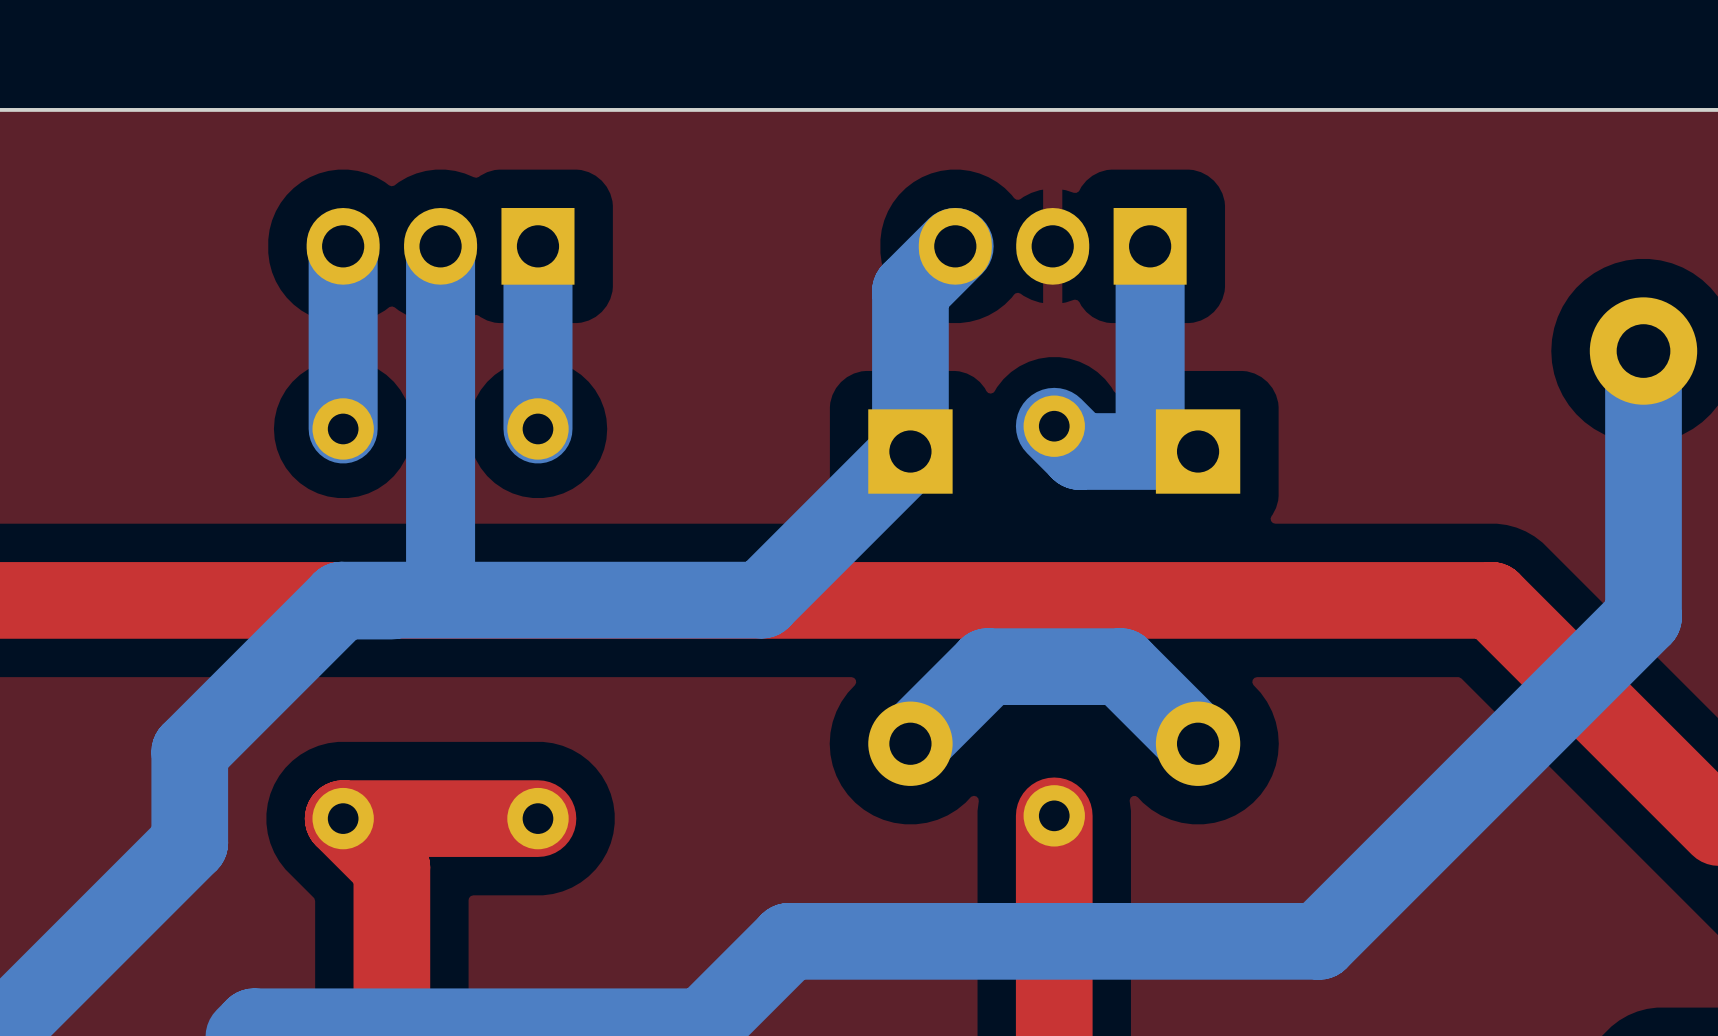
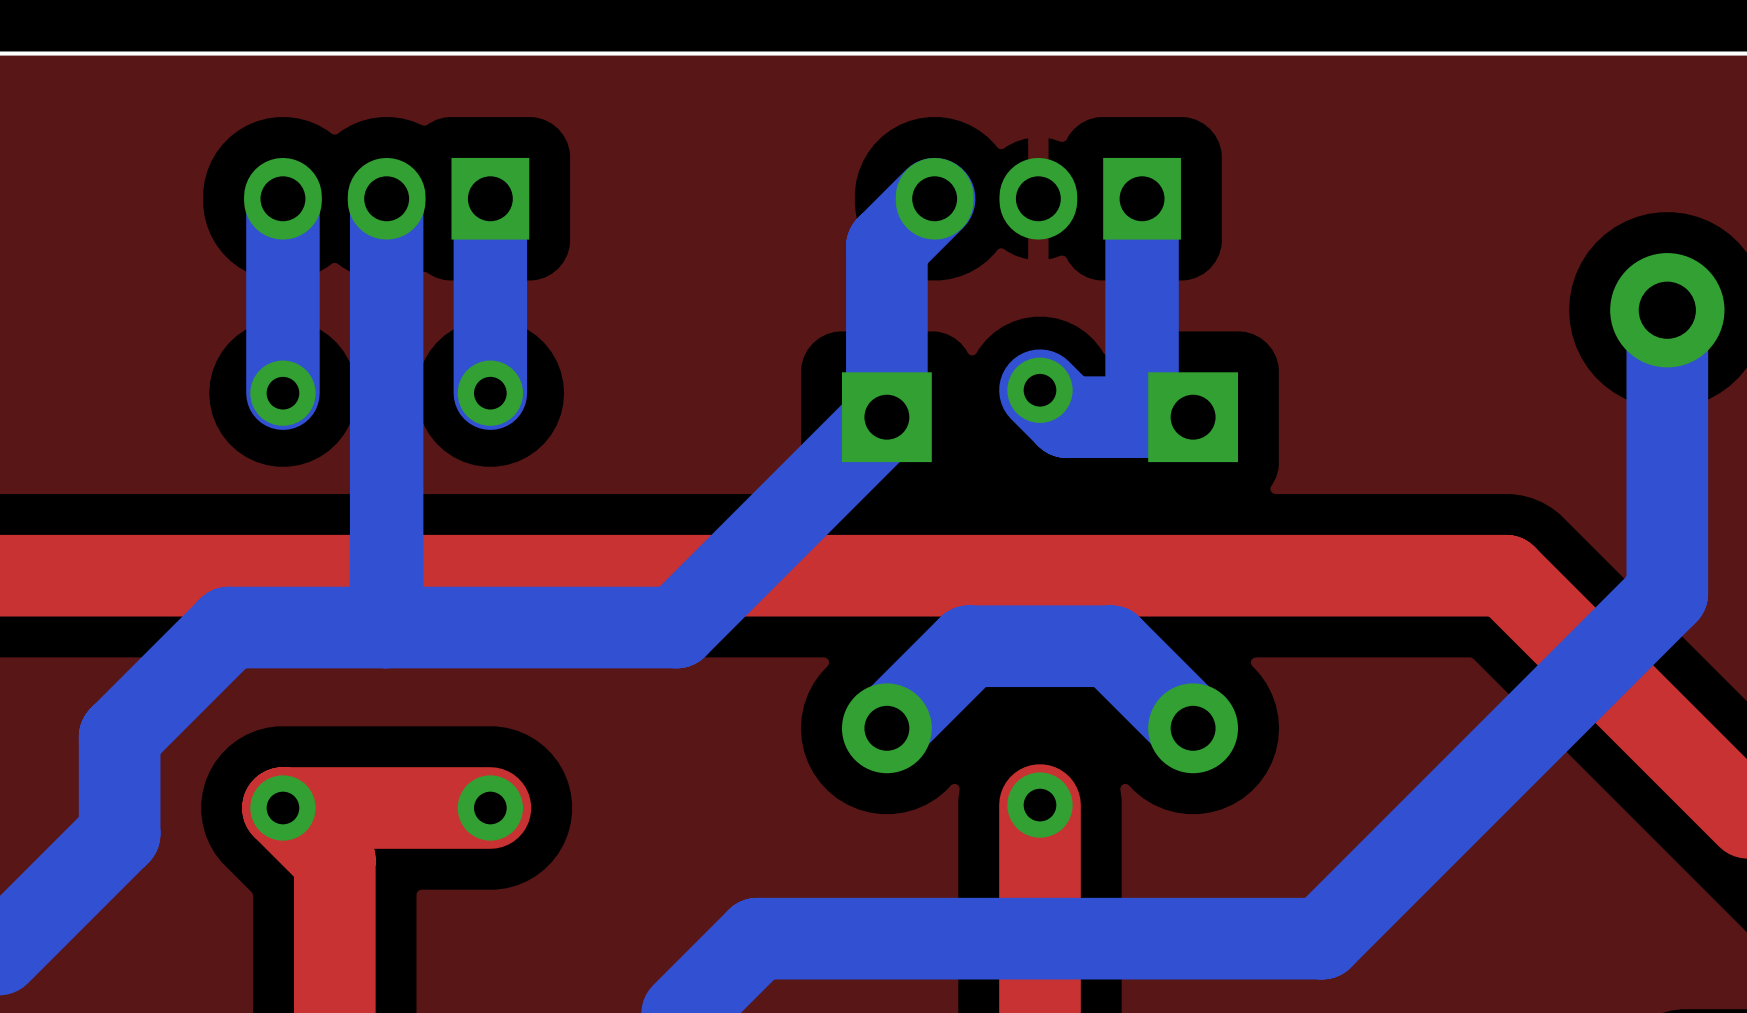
bottom track: (761, 600) (341, 600) (292, 649) -> (728, 575) (676, 627) (229, 627)

